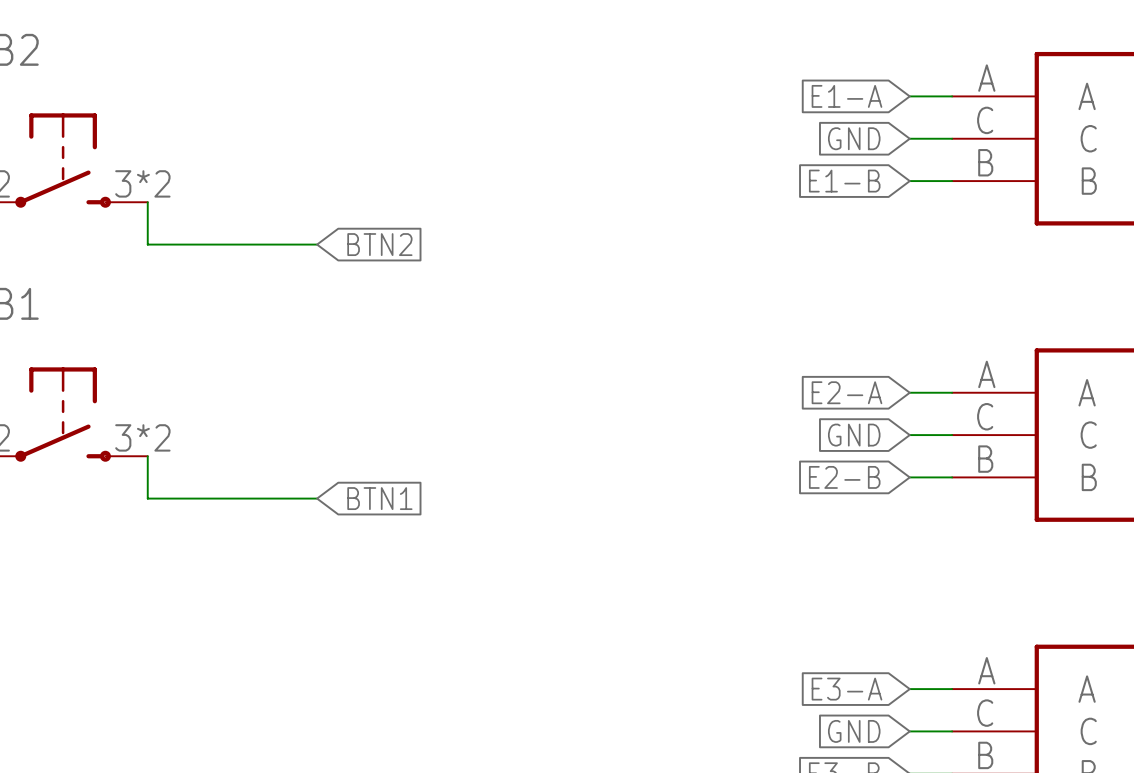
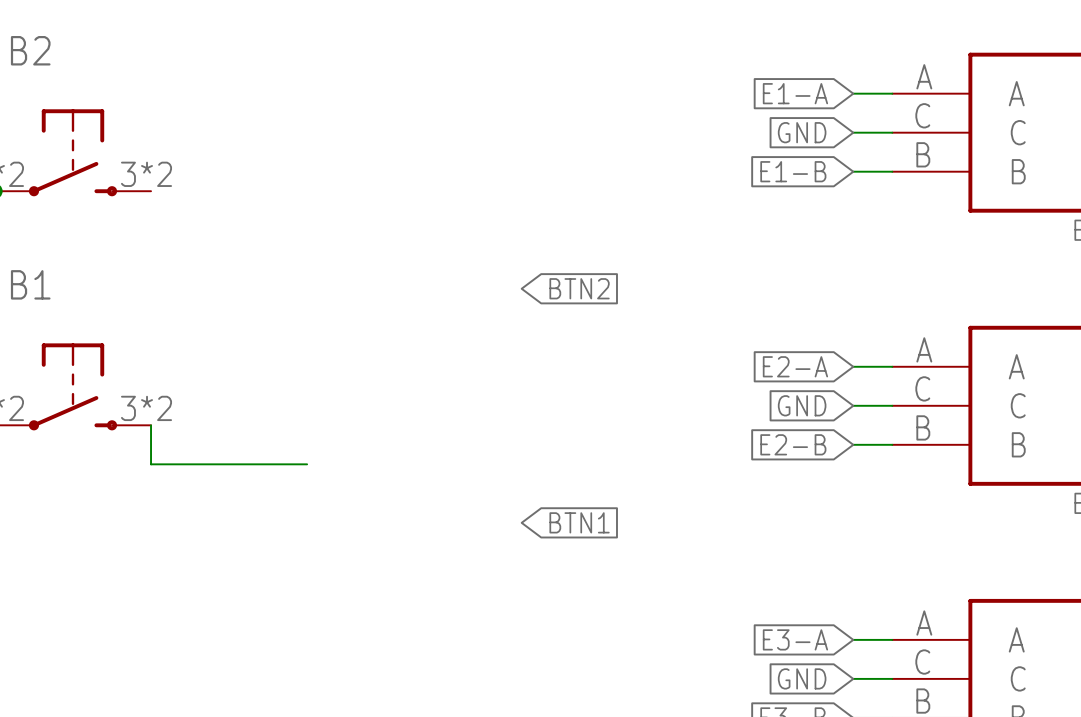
wire: (147, 202) (147, 244) (317, 244) -> none
global label position: BTN2 (379, 244) -> BTN2 (579, 288)
global label position: BTN1 (379, 498) -> BTN1 (579, 522)

